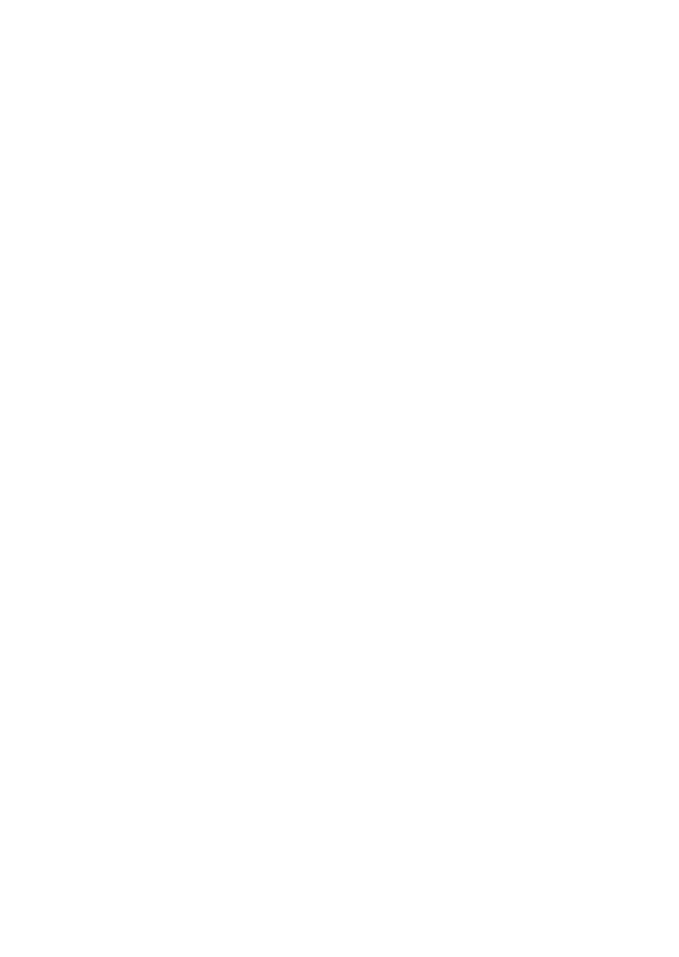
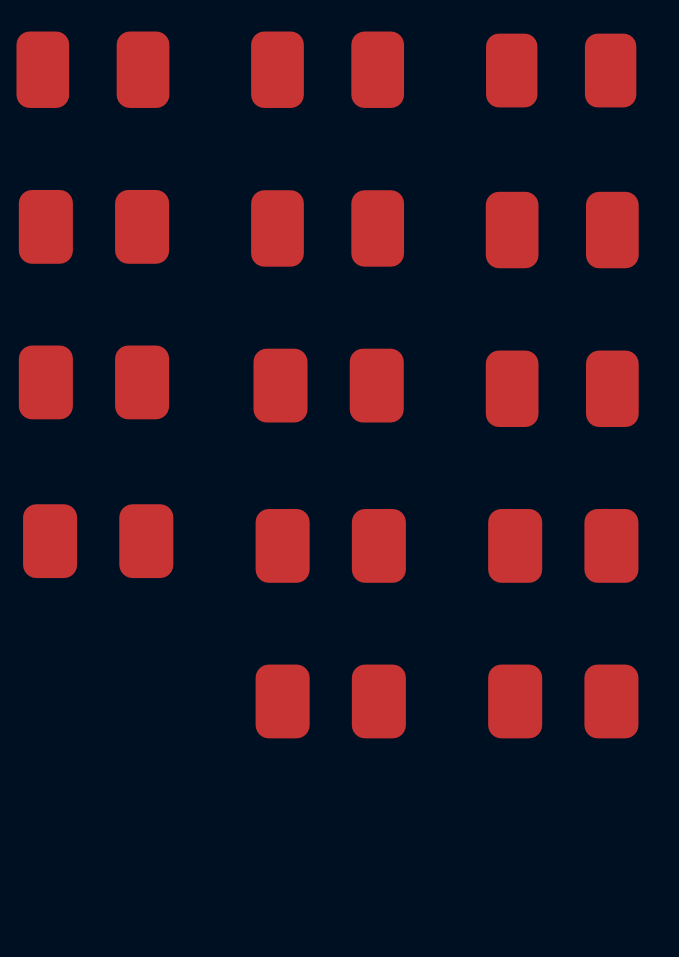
part: none -> (92, 69)
part: none -> (327, 69)
part: none -> (561, 70)
part: none -> (93, 226)
part: none -> (327, 228)
part: none -> (562, 230)
part: none -> (93, 382)
part: none -> (328, 385)
part: none -> (562, 388)
part: none -> (98, 541)
part: none -> (330, 545)
part: none -> (563, 545)
part: none -> (330, 701)
part: none -> (563, 701)

